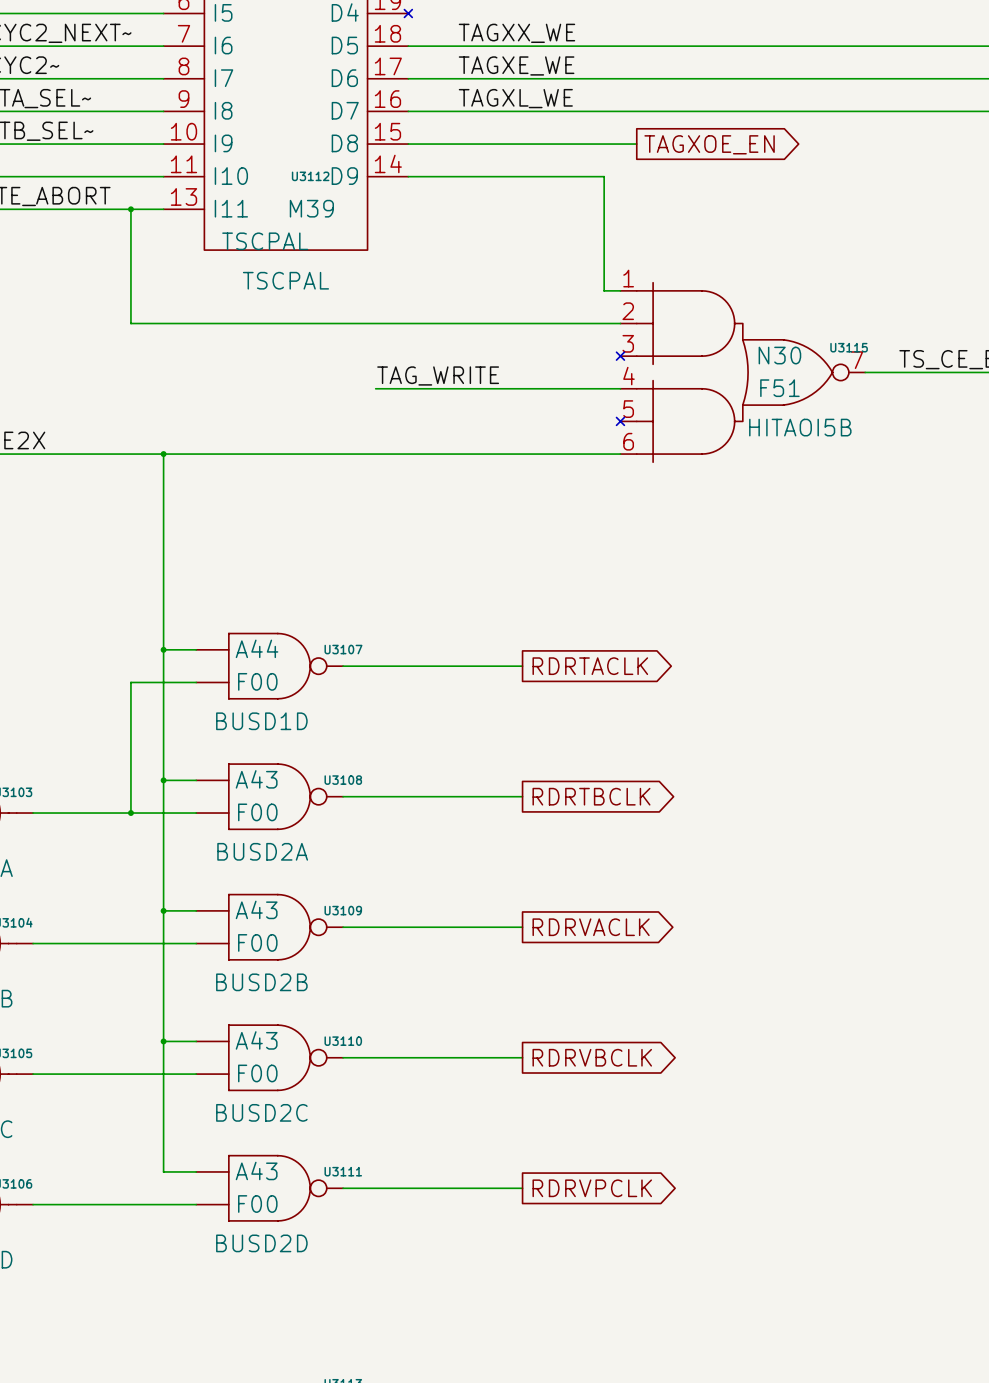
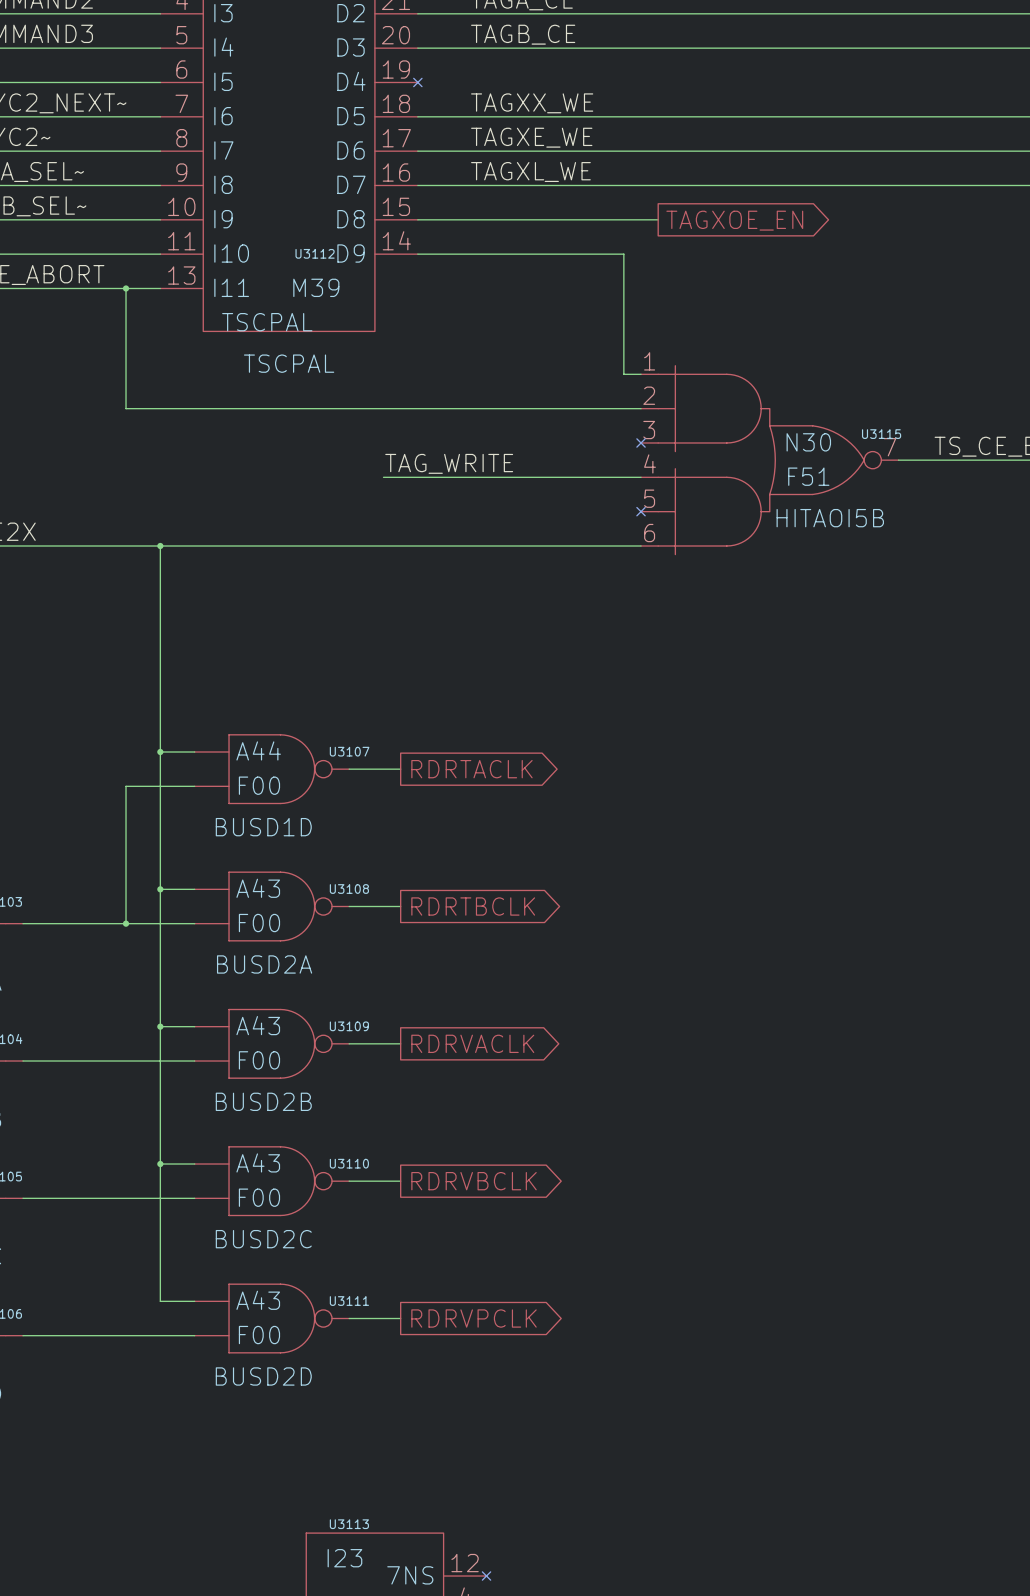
wire: (392, 666) (522, 666) -> none
global label position: RDRTACLK (590, 666) -> RDRTACLK (471, 769)
wire: (392, 796) (522, 796) -> none
global label position: RDRTBCLK (591, 796) -> RDRTBCLK (473, 906)
wire: (392, 927) (522, 927) -> none
global label position: RDRVACLK (591, 927) -> RDRVACLK (472, 1043)
wire: (392, 1057) (522, 1057) -> none
global label position: RDRVBCLK (592, 1057) -> RDRVBCLK (474, 1181)
wire: (392, 1188) (522, 1188) -> none
global label position: RDRVPCLK (592, 1188) -> RDRVPCLK (474, 1318)

